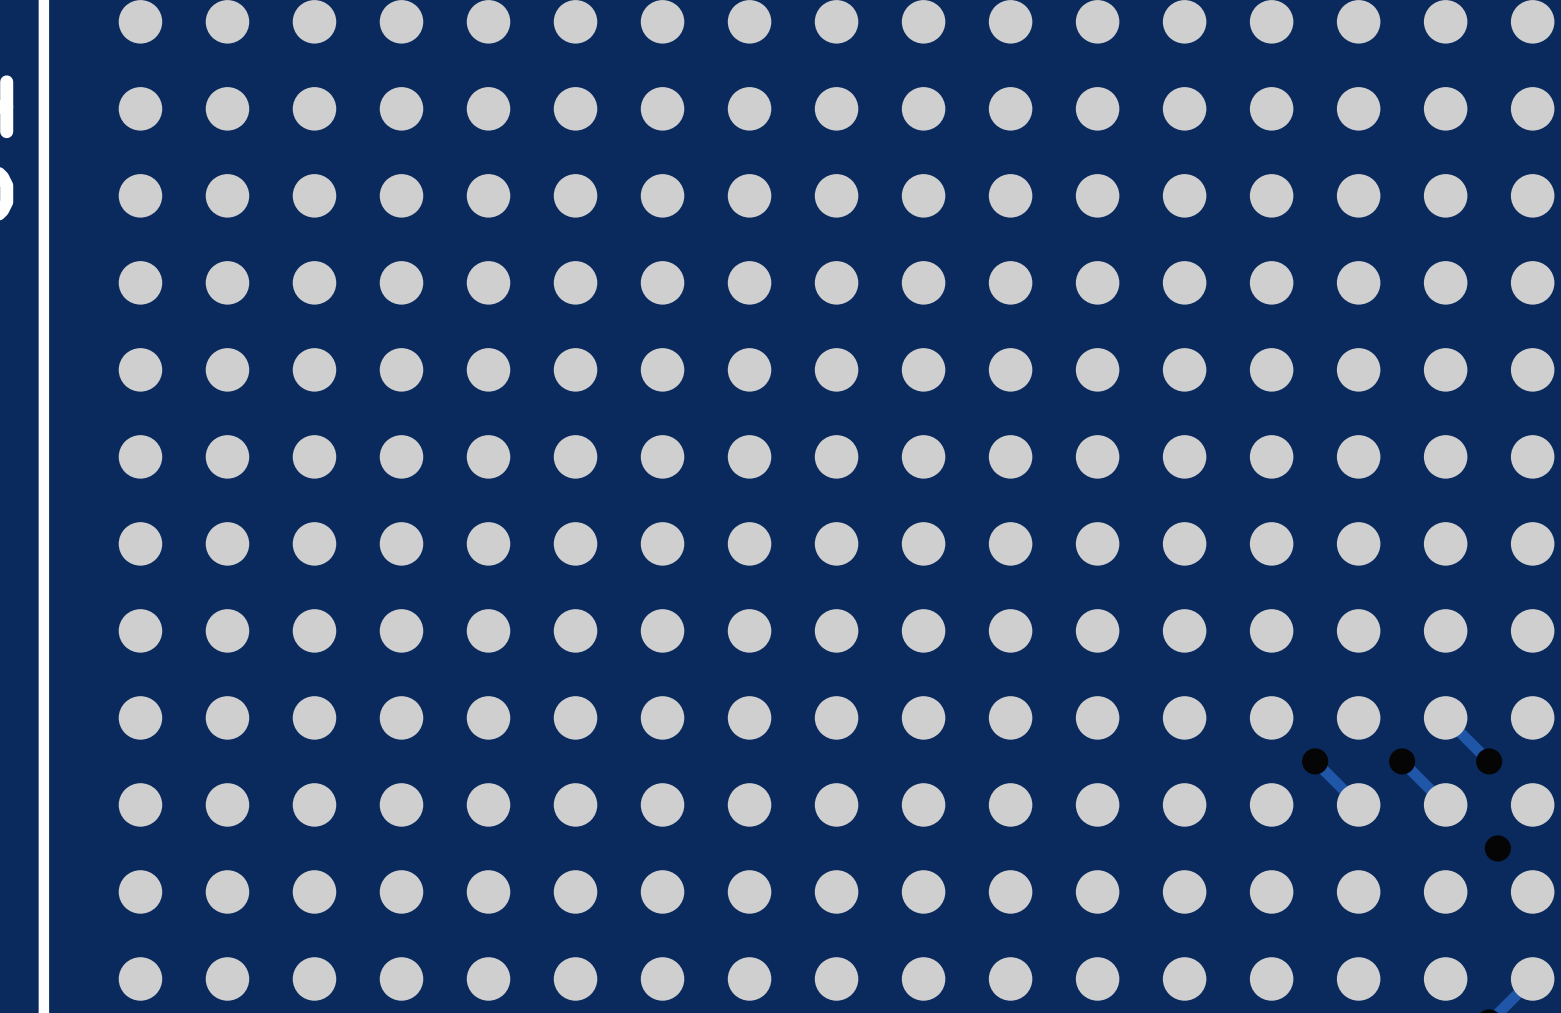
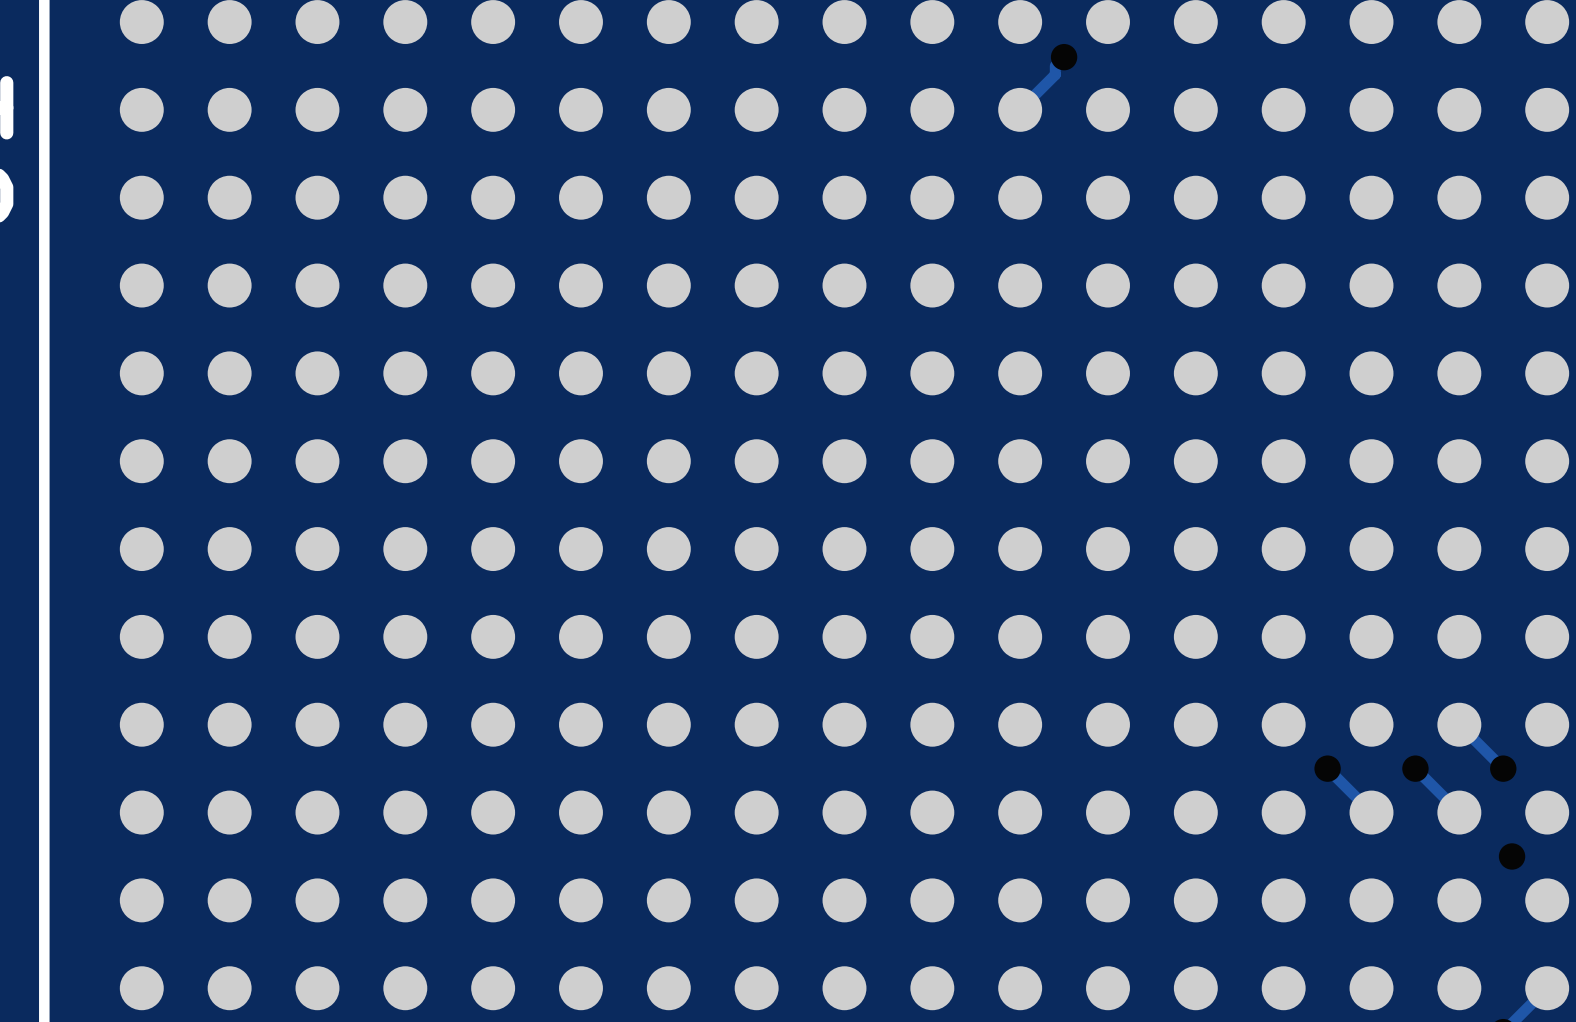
via: none -> (1064, 57)
track: none -> (1055, 65) (1055, 74) (1020, 109)

